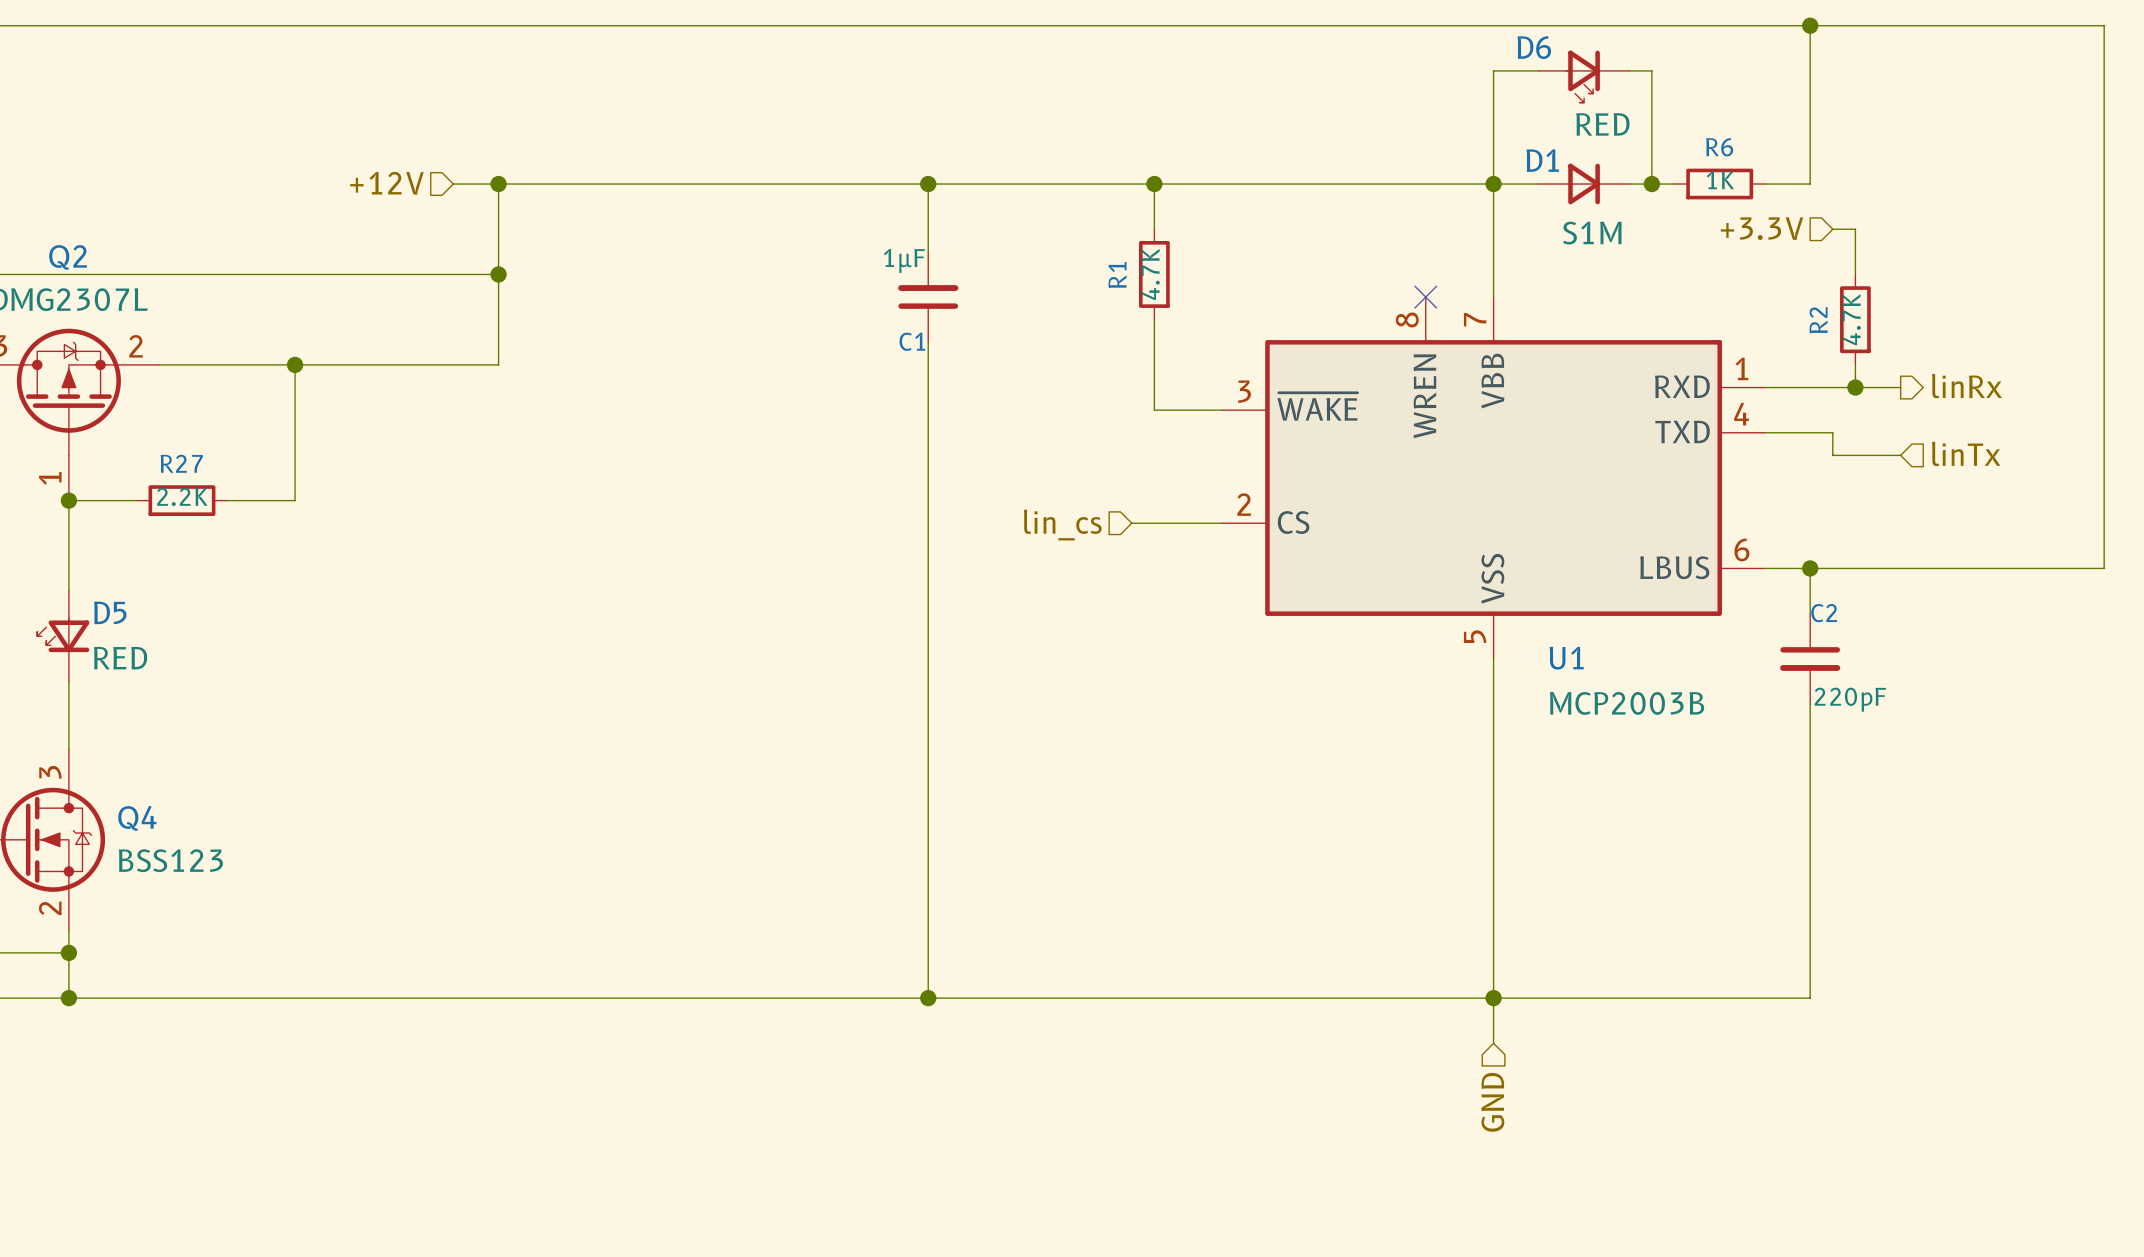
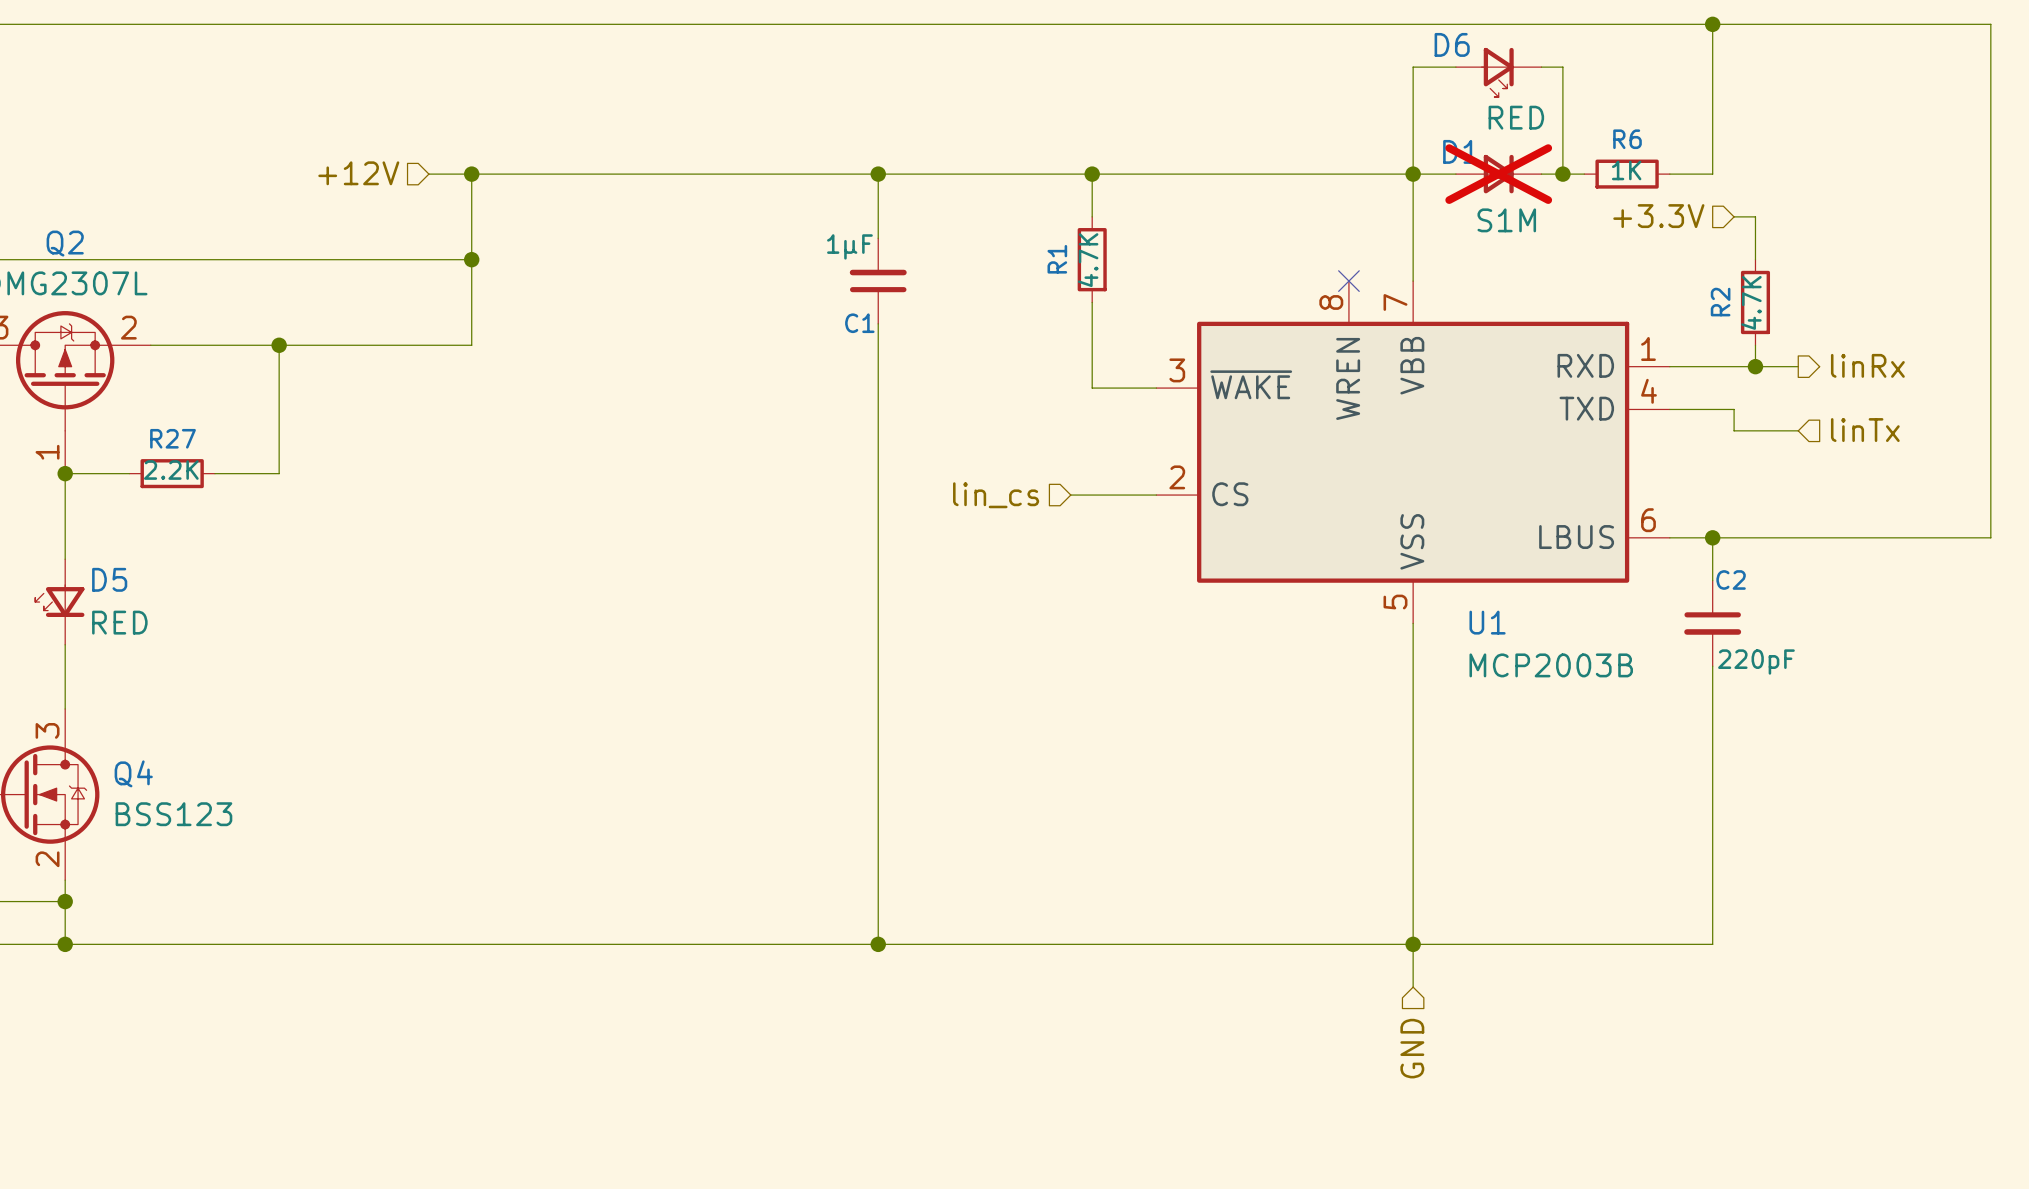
D1 do-not-place cross: none -> (1498, 174)

